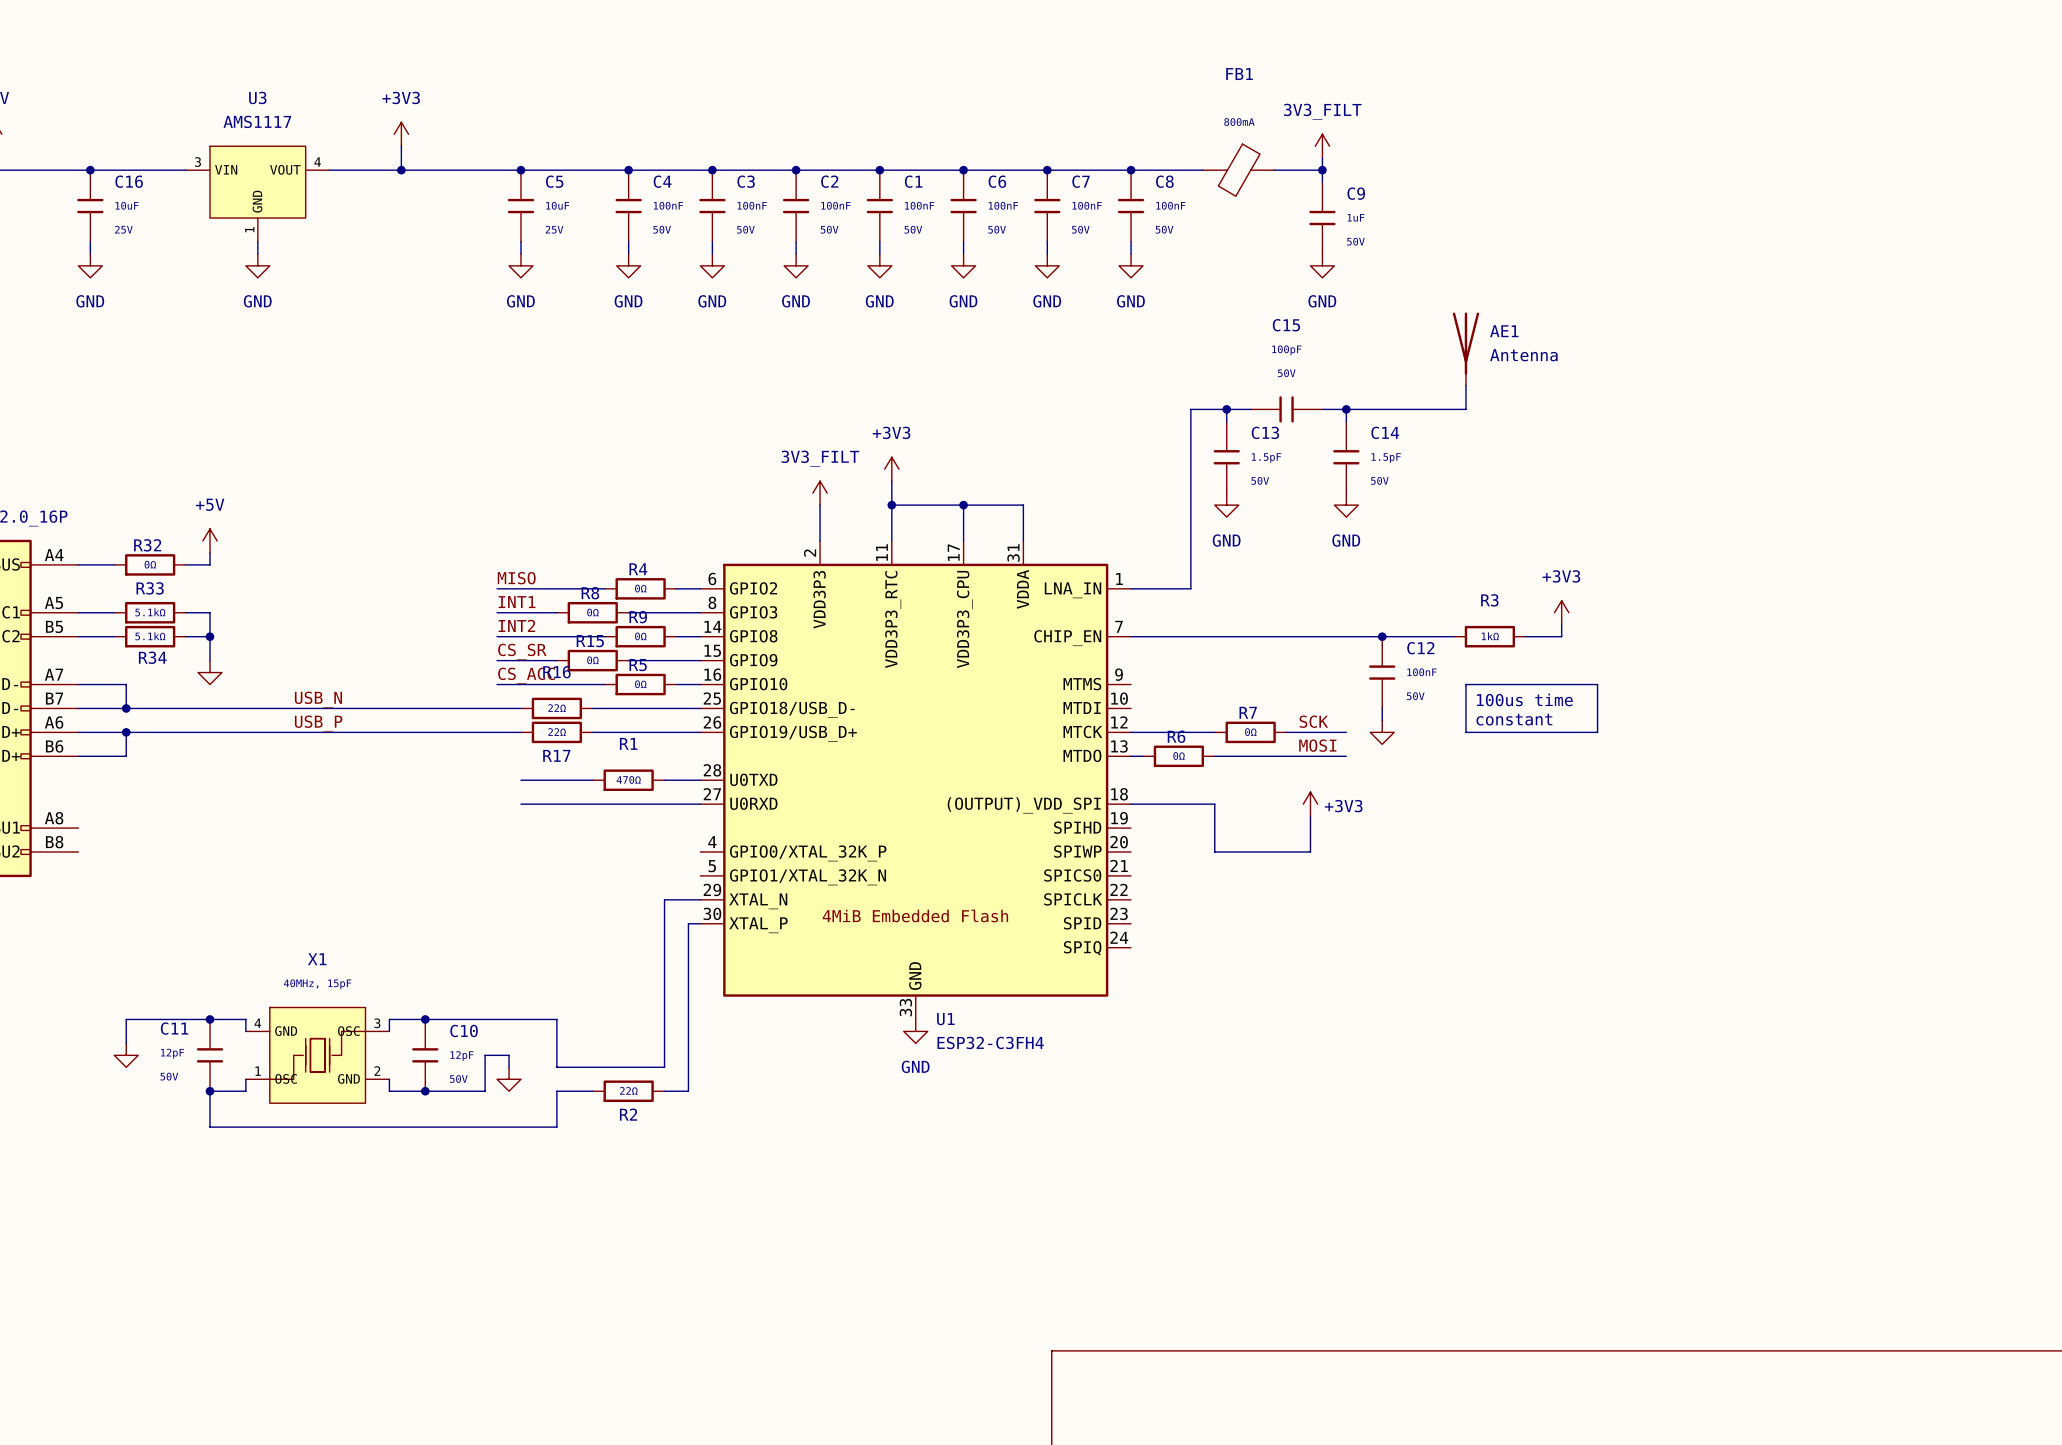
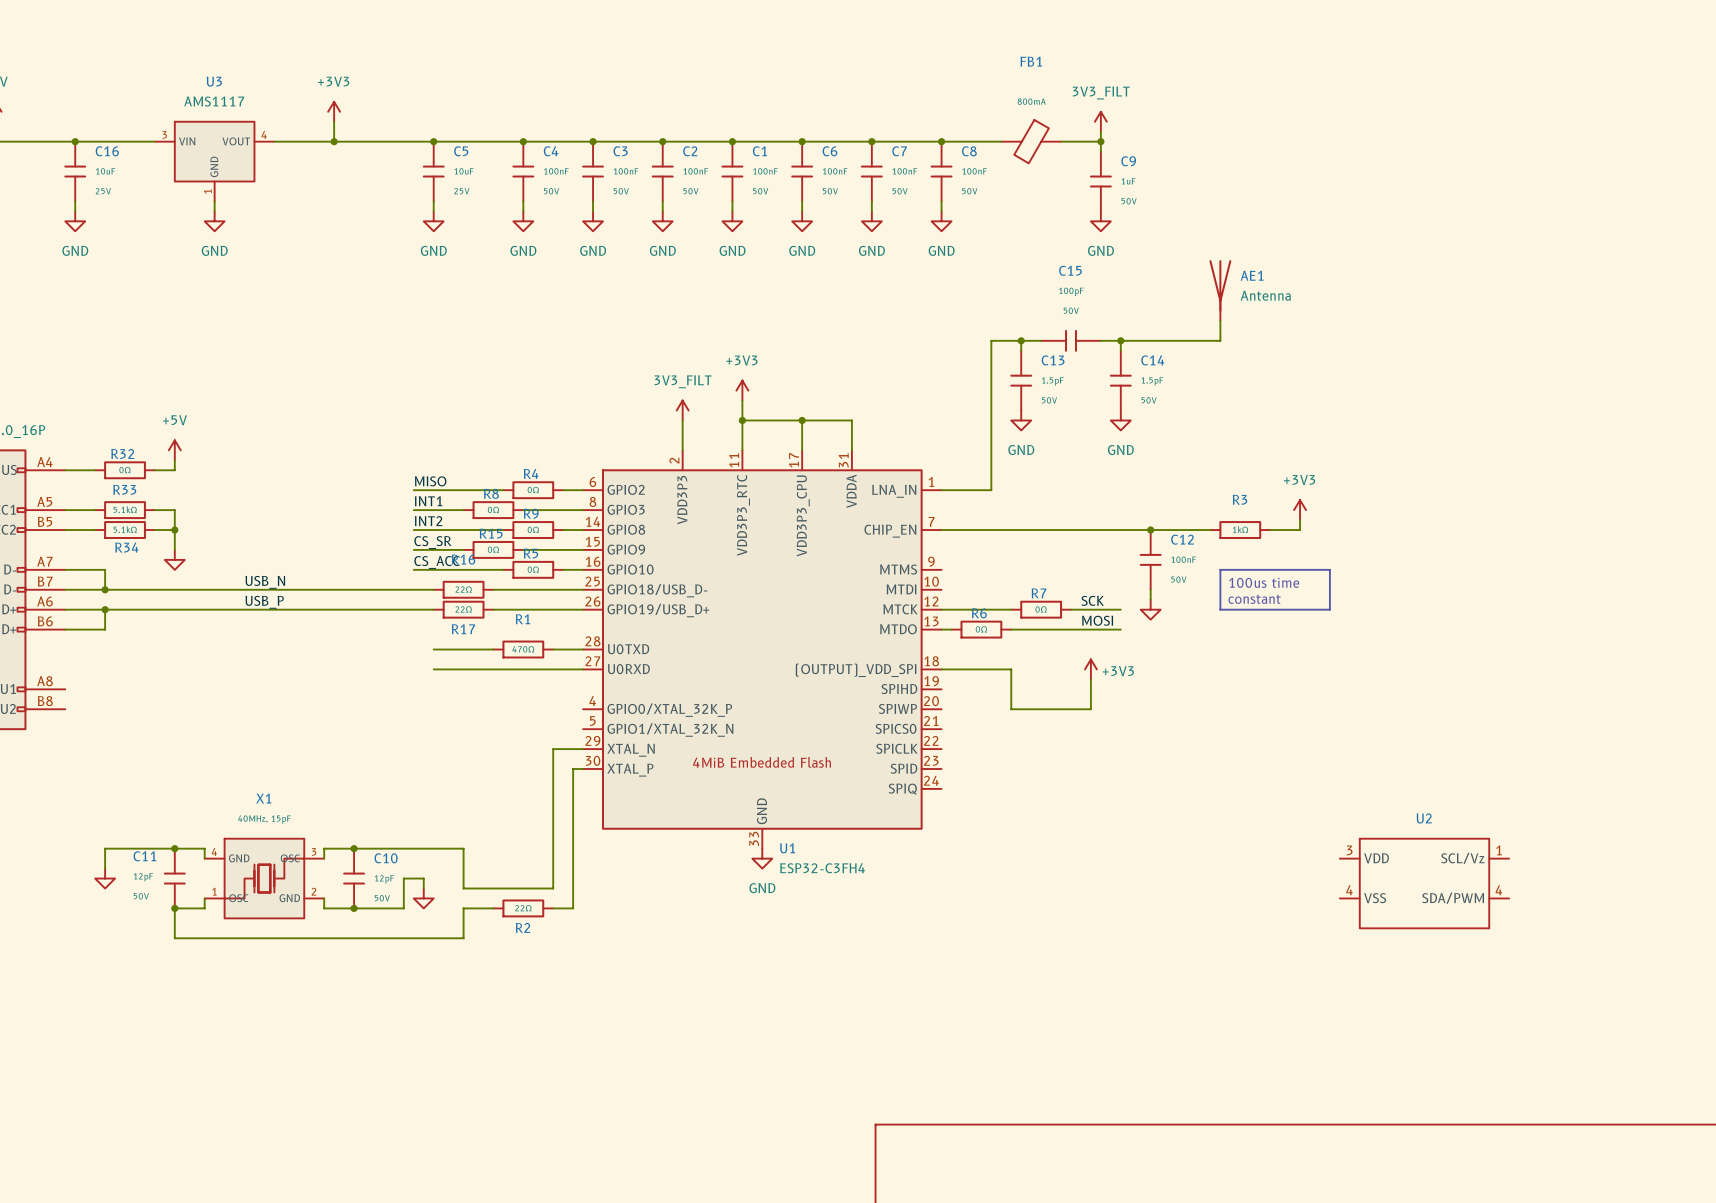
U2: none -> (1424, 883)

